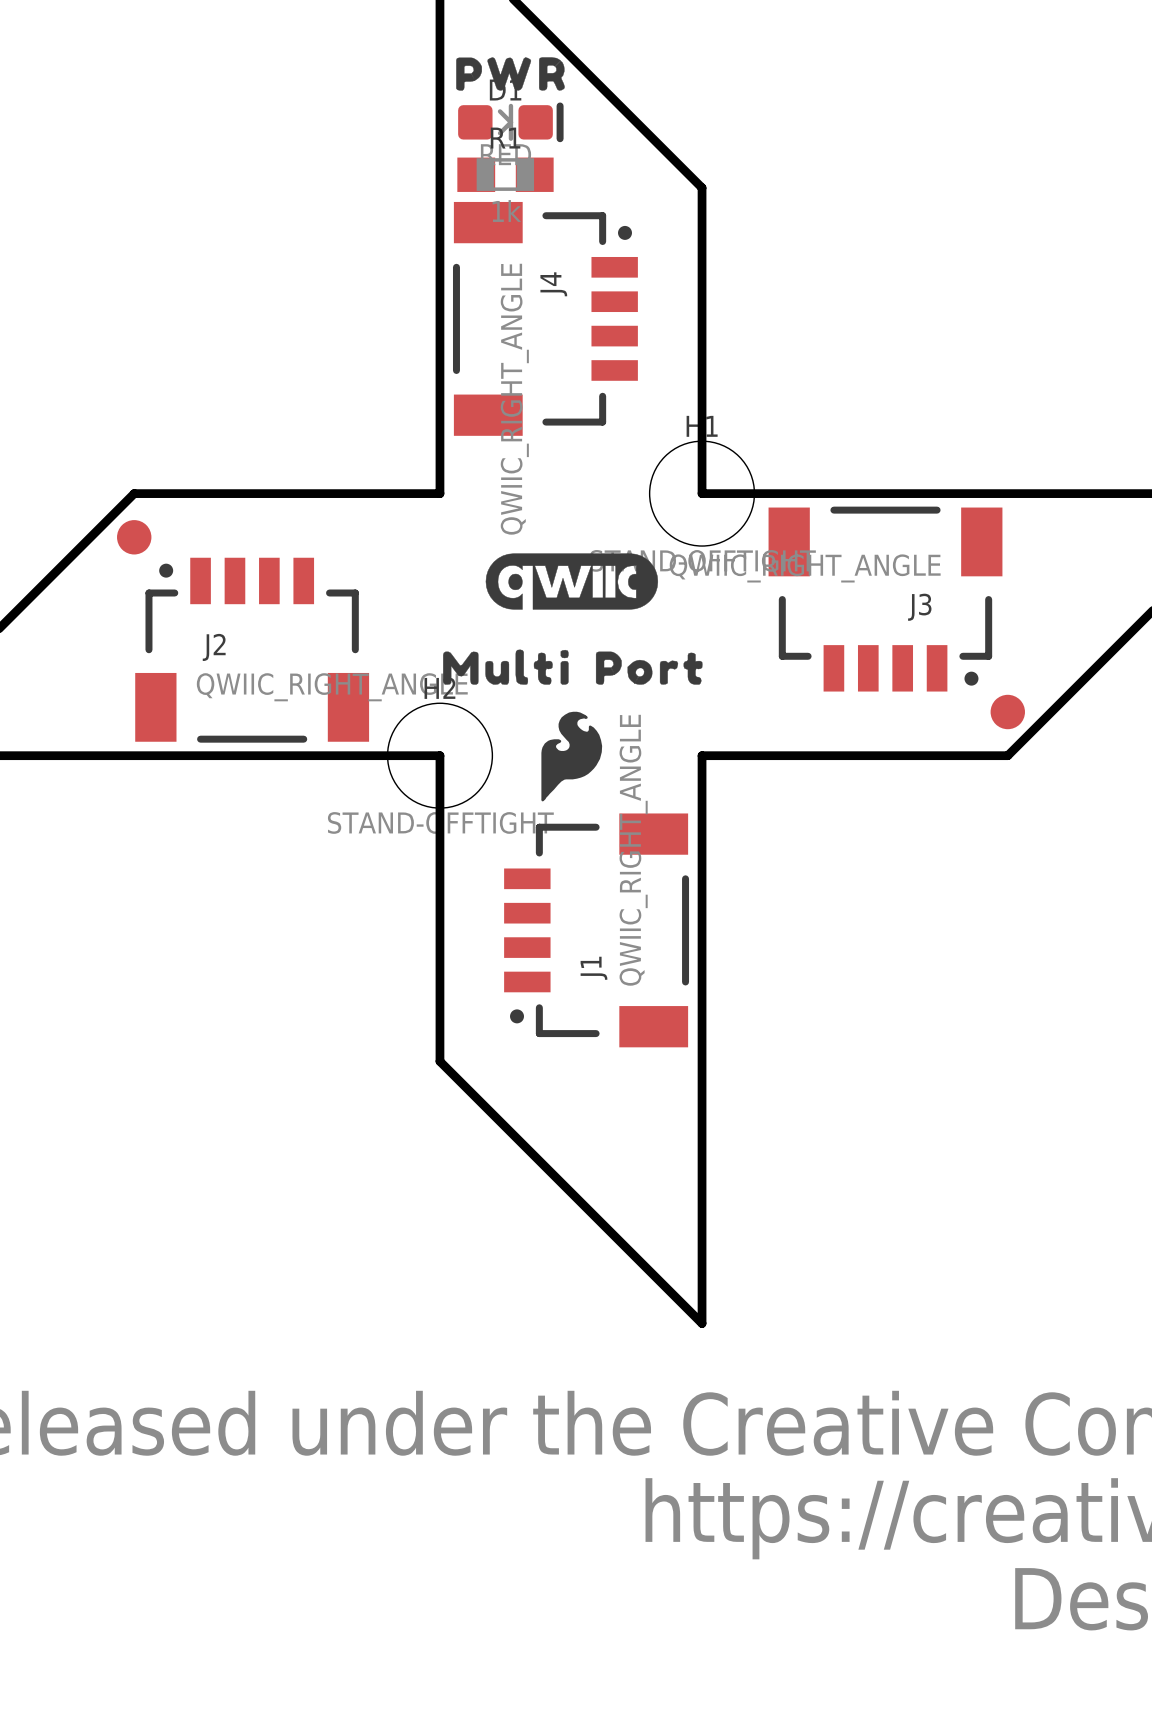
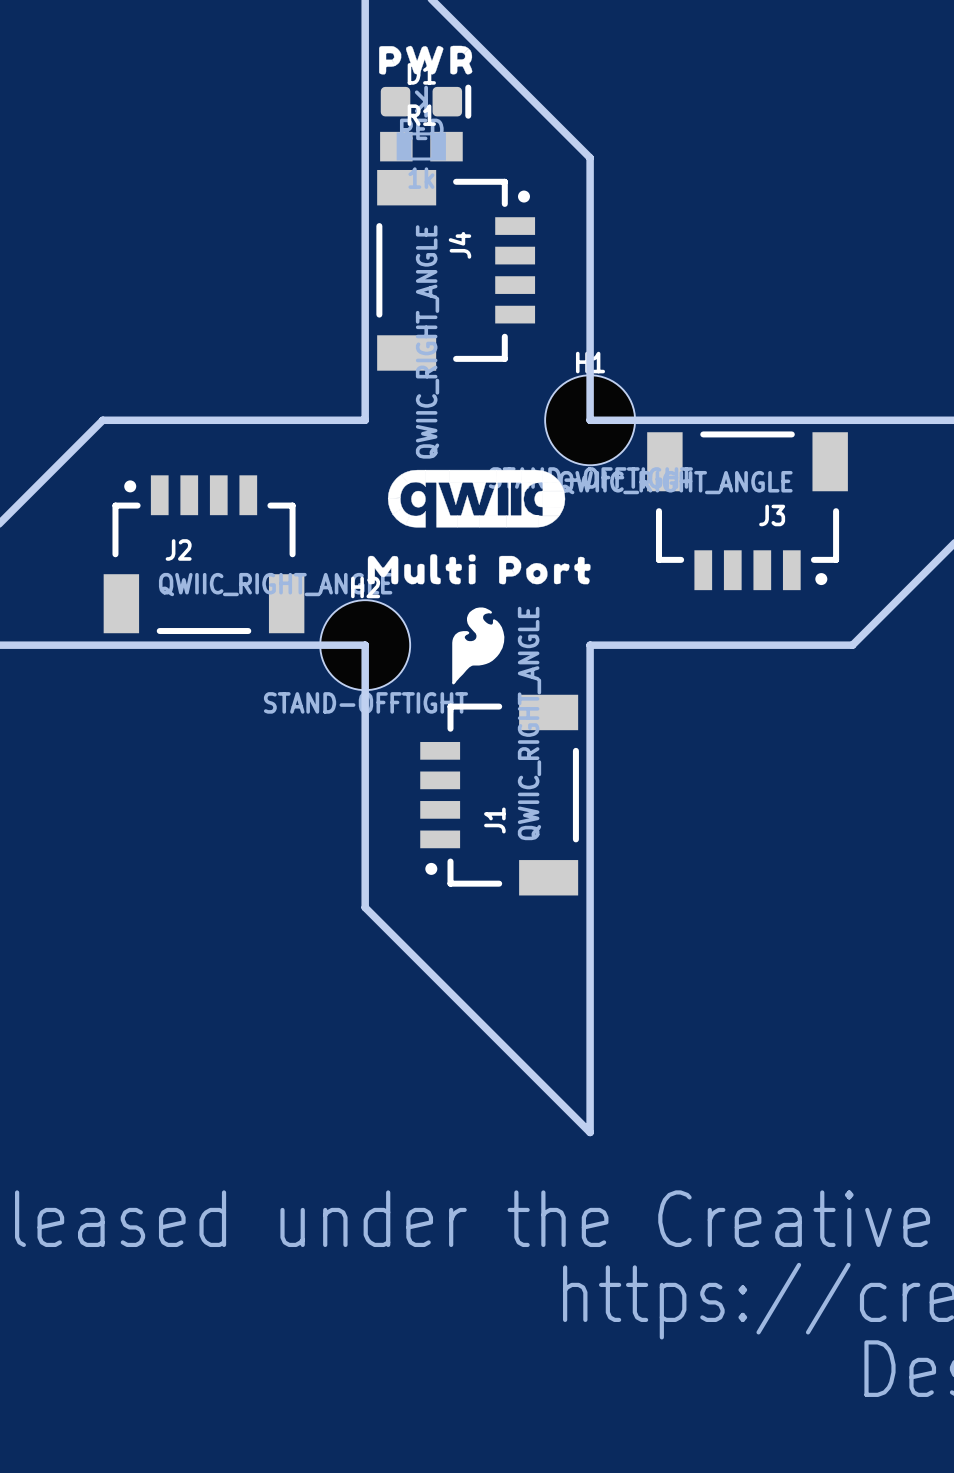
part: (134, 537) -> none
drawing shape: [485, 553, 659, 610] -> [387, 469, 566, 528]
part: (1007, 712) -> none

